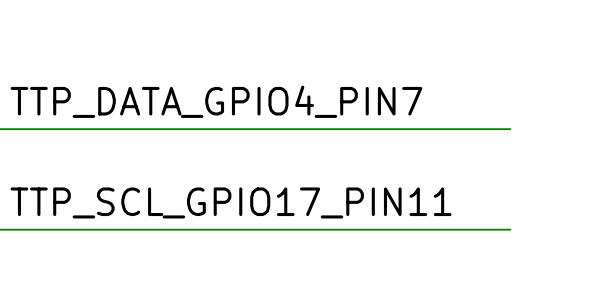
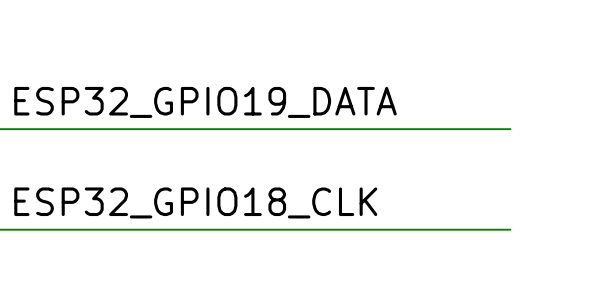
label: TTP_DATA_GPIO4_PIN7 (216, 101) -> ESP32_GPIO19_DATA (205, 102)
label: TTP_SCL_GPIO17_PIN11 (231, 202) -> ESP32_GPIO18_CLK (195, 202)

